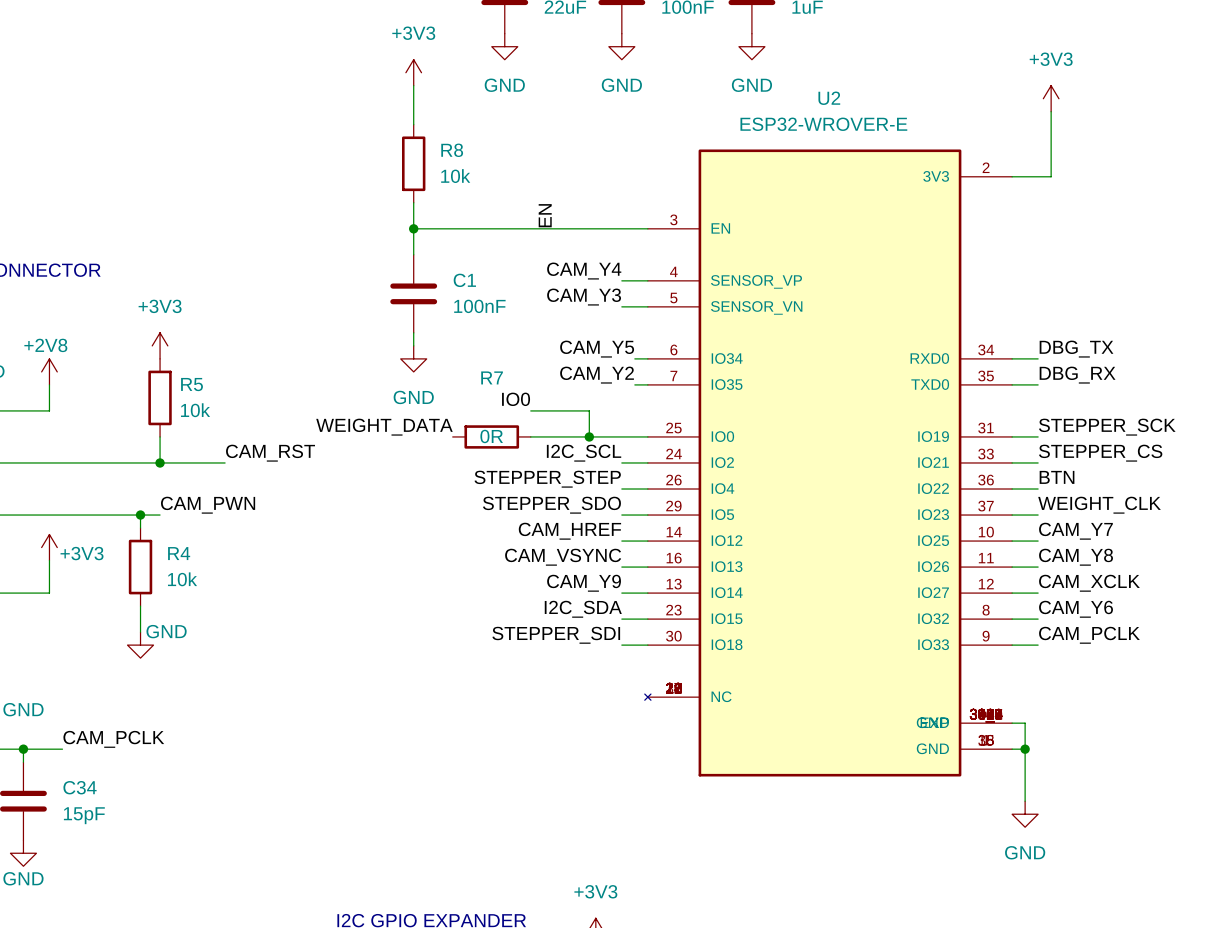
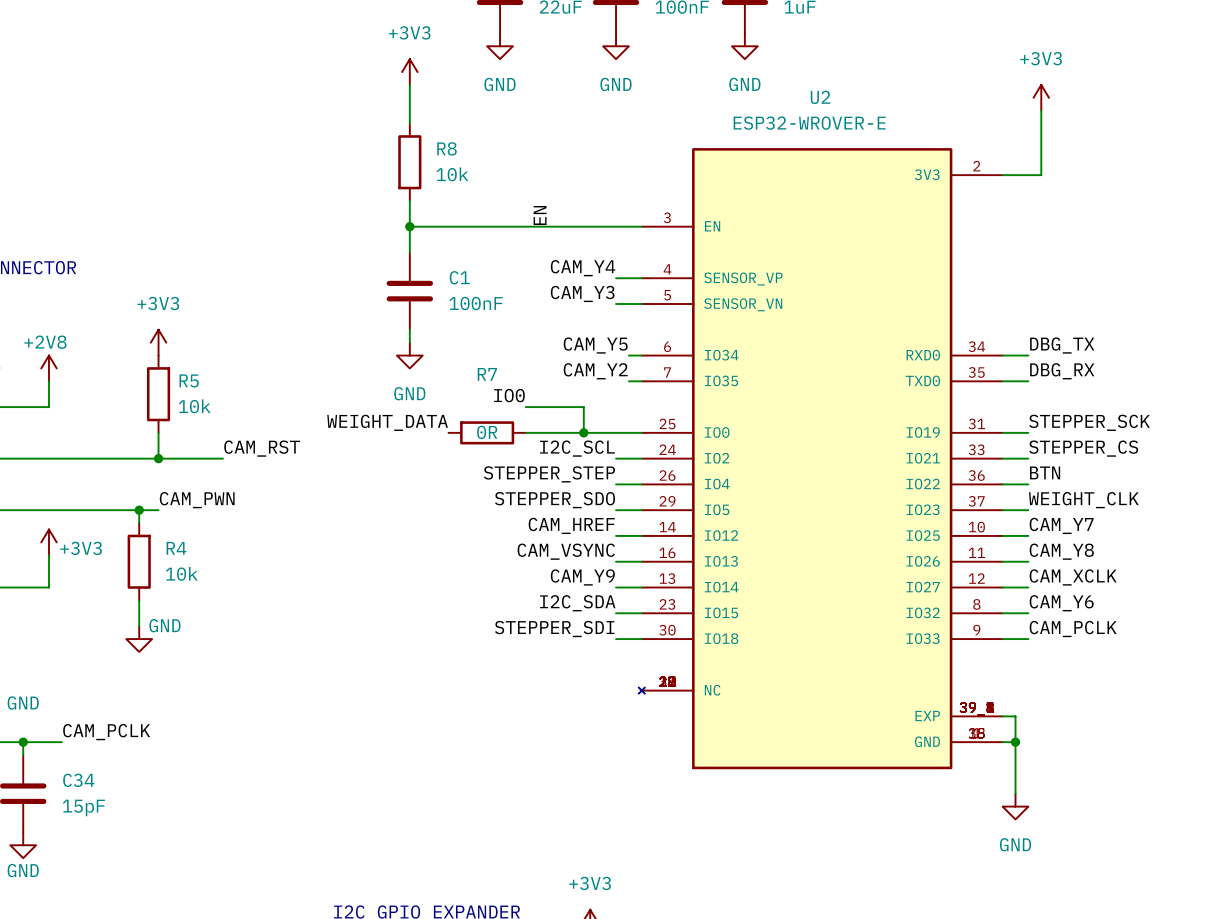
U2 symbol: [644, 149, 1013, 777] -> [638, 148, 1003, 770]

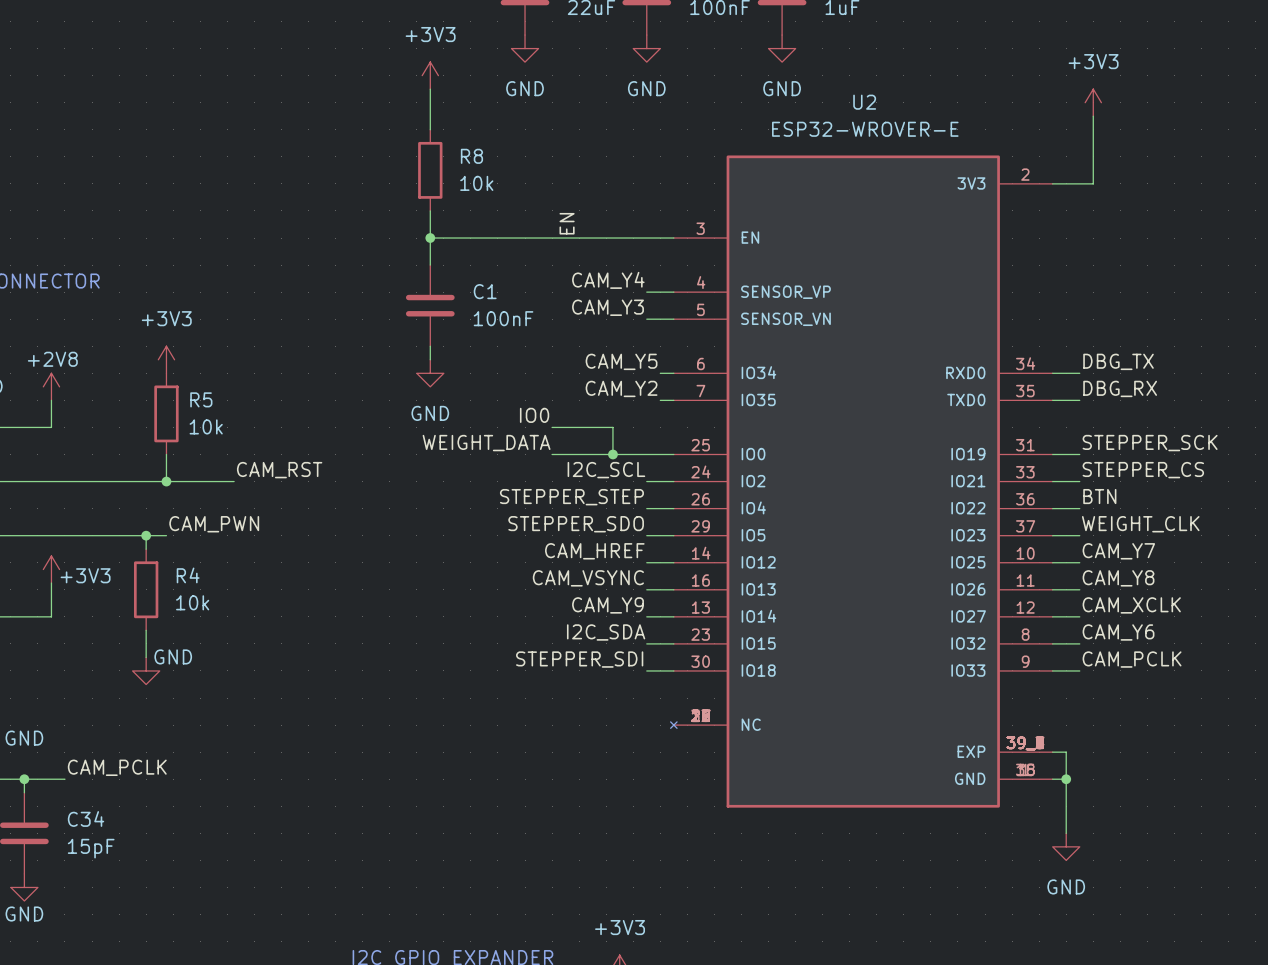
label position: WEIGHT_DATA (387, 422) -> WEIGHT_DATA (486, 443)
R7: 0R (487, 432) -> none

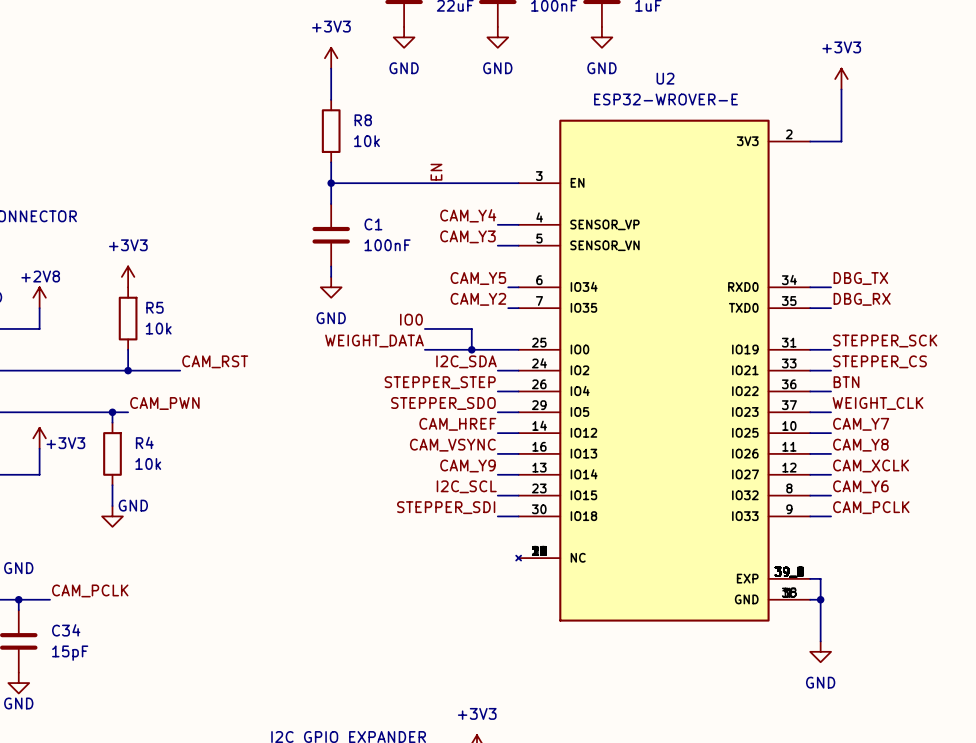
label: I2C_SCL (606, 470) -> I2C_SDA (466, 361)
label: I2C_SDA (606, 632) -> I2C_SCL (466, 486)

